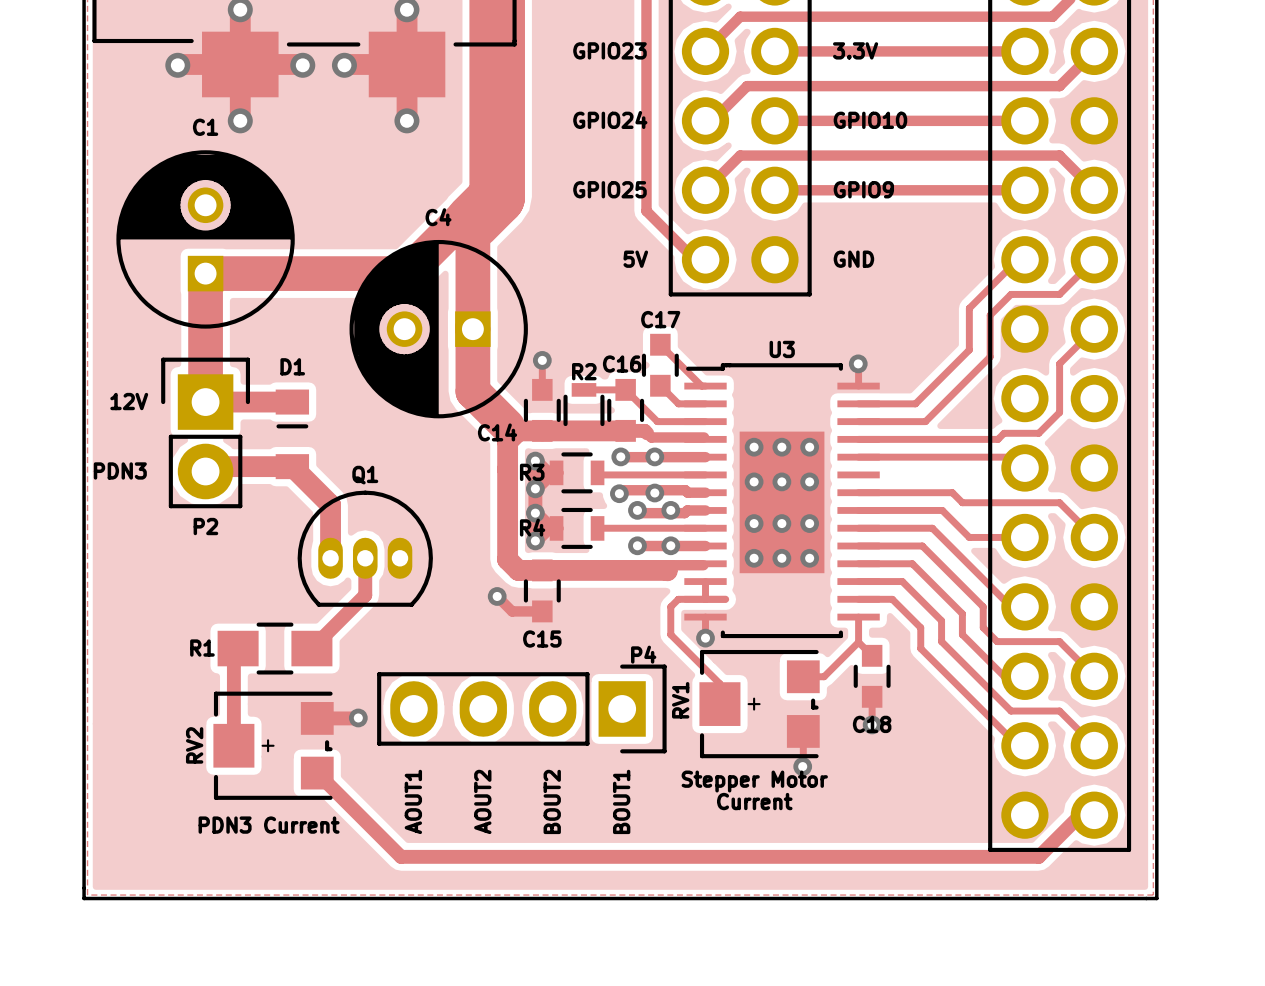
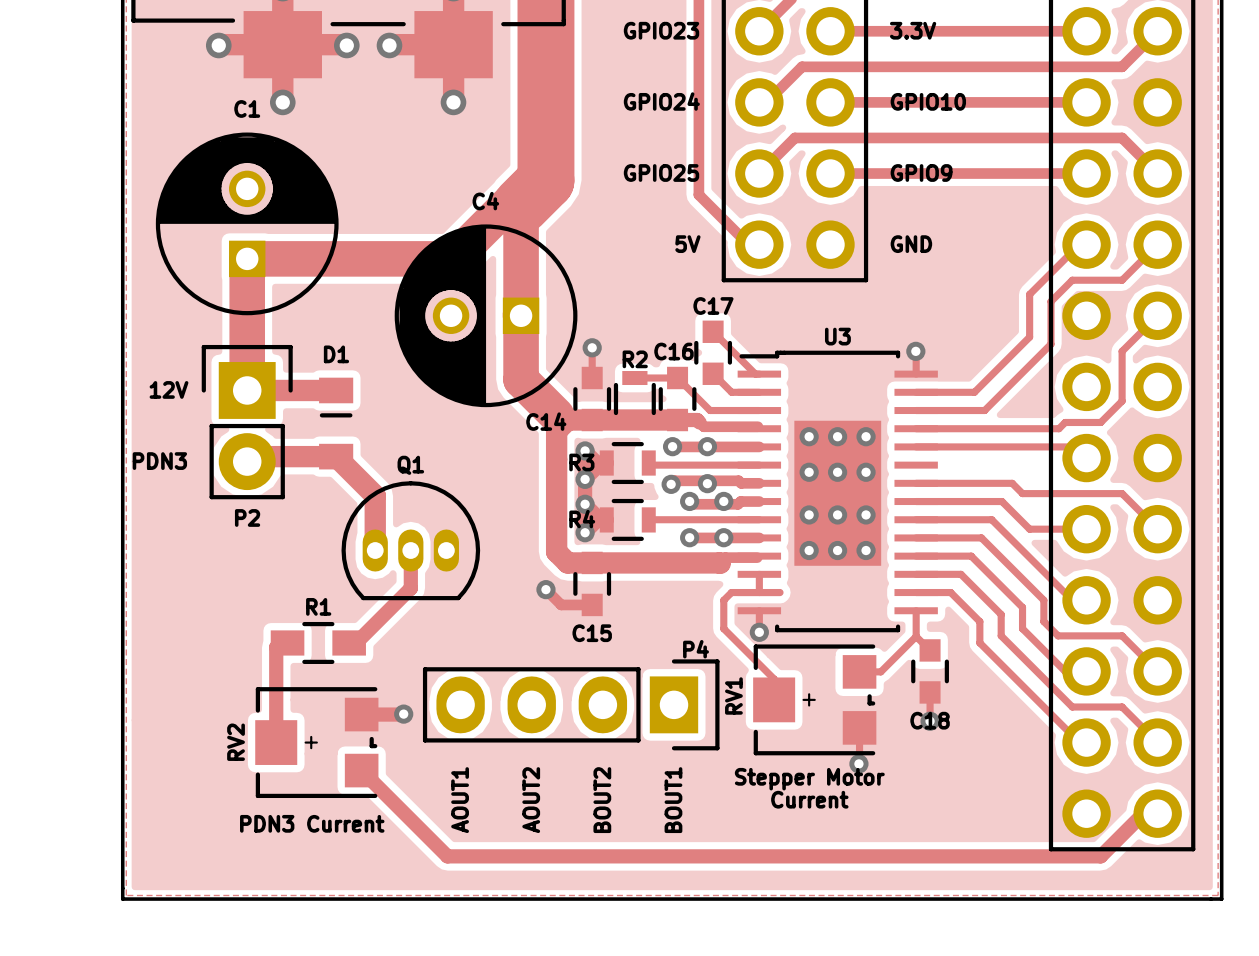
R1 footprint: [217, 622, 333, 675] -> [270, 621, 366, 664]
R1 name position: R1 (202, 648) -> R1 (318, 606)

